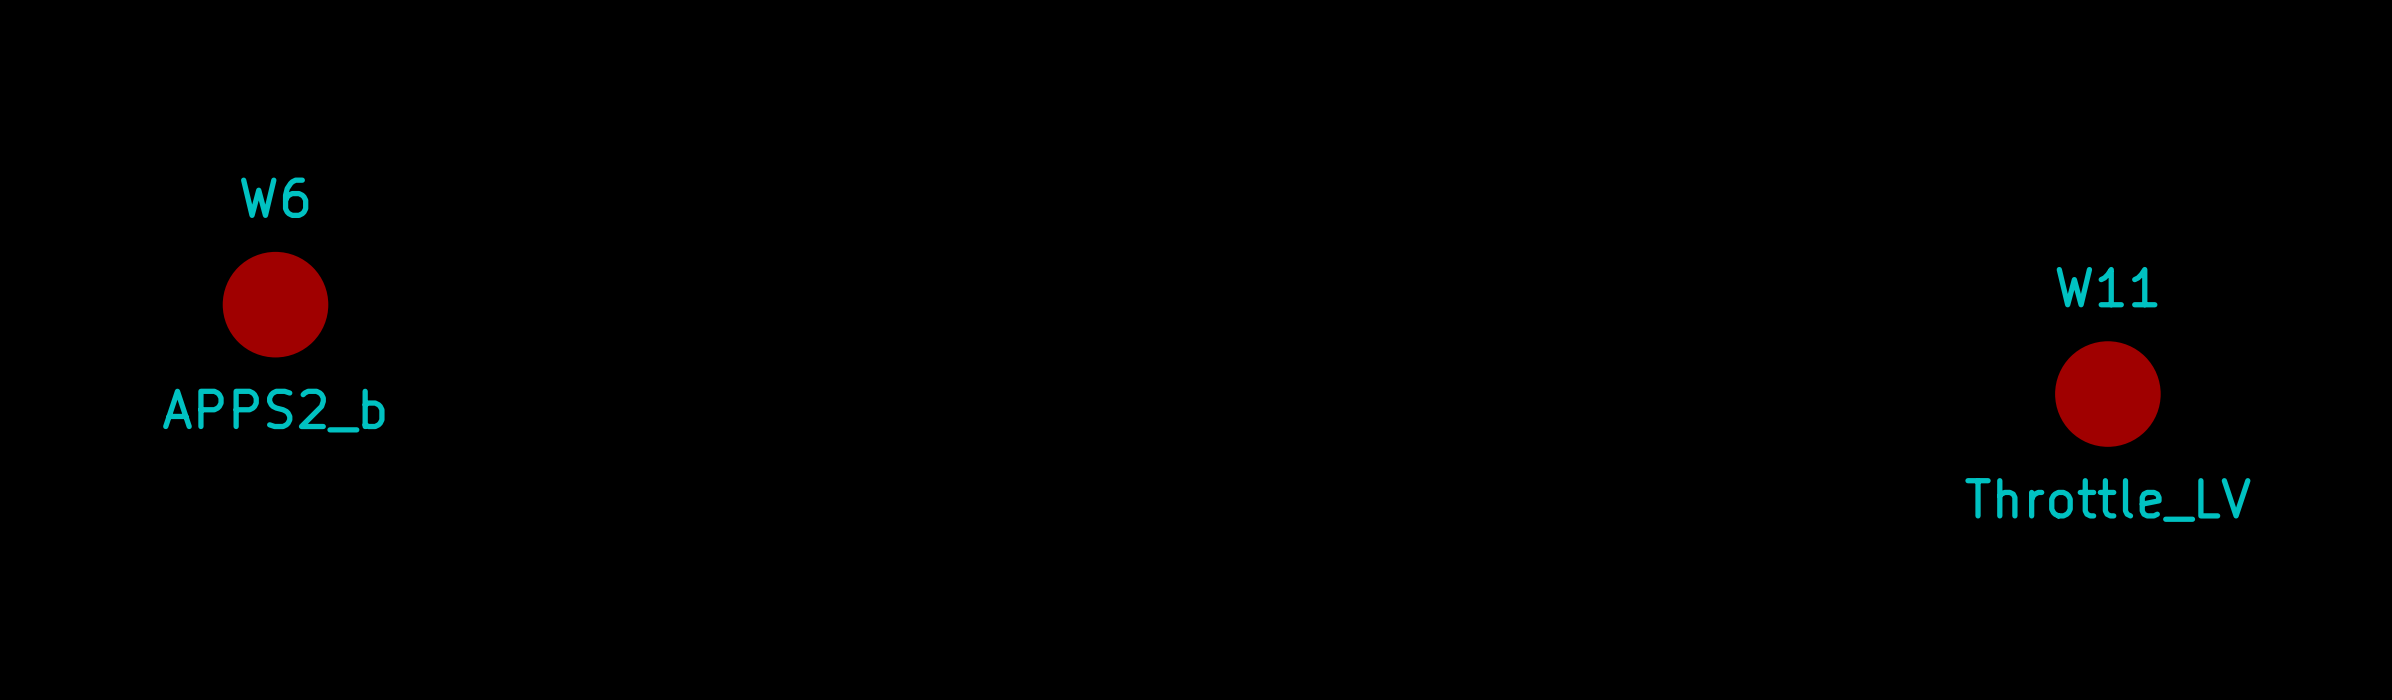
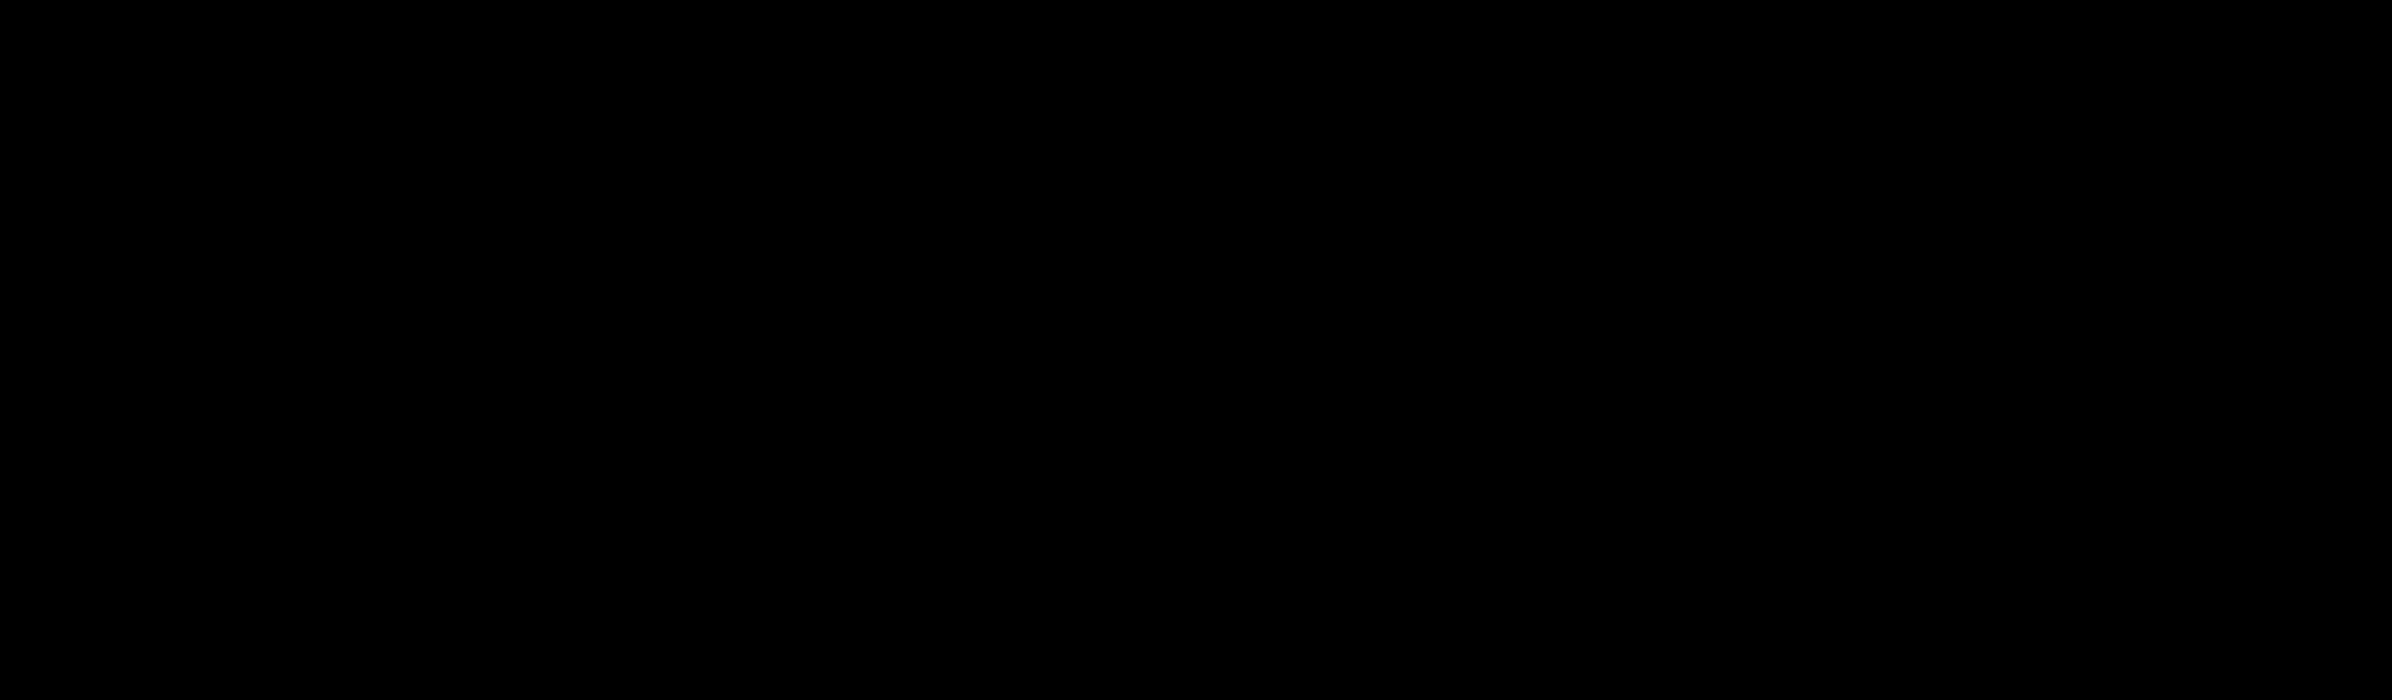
W6: APPS2_b (275, 304) -> none
W11: Throttle_LV (2107, 394) -> none

